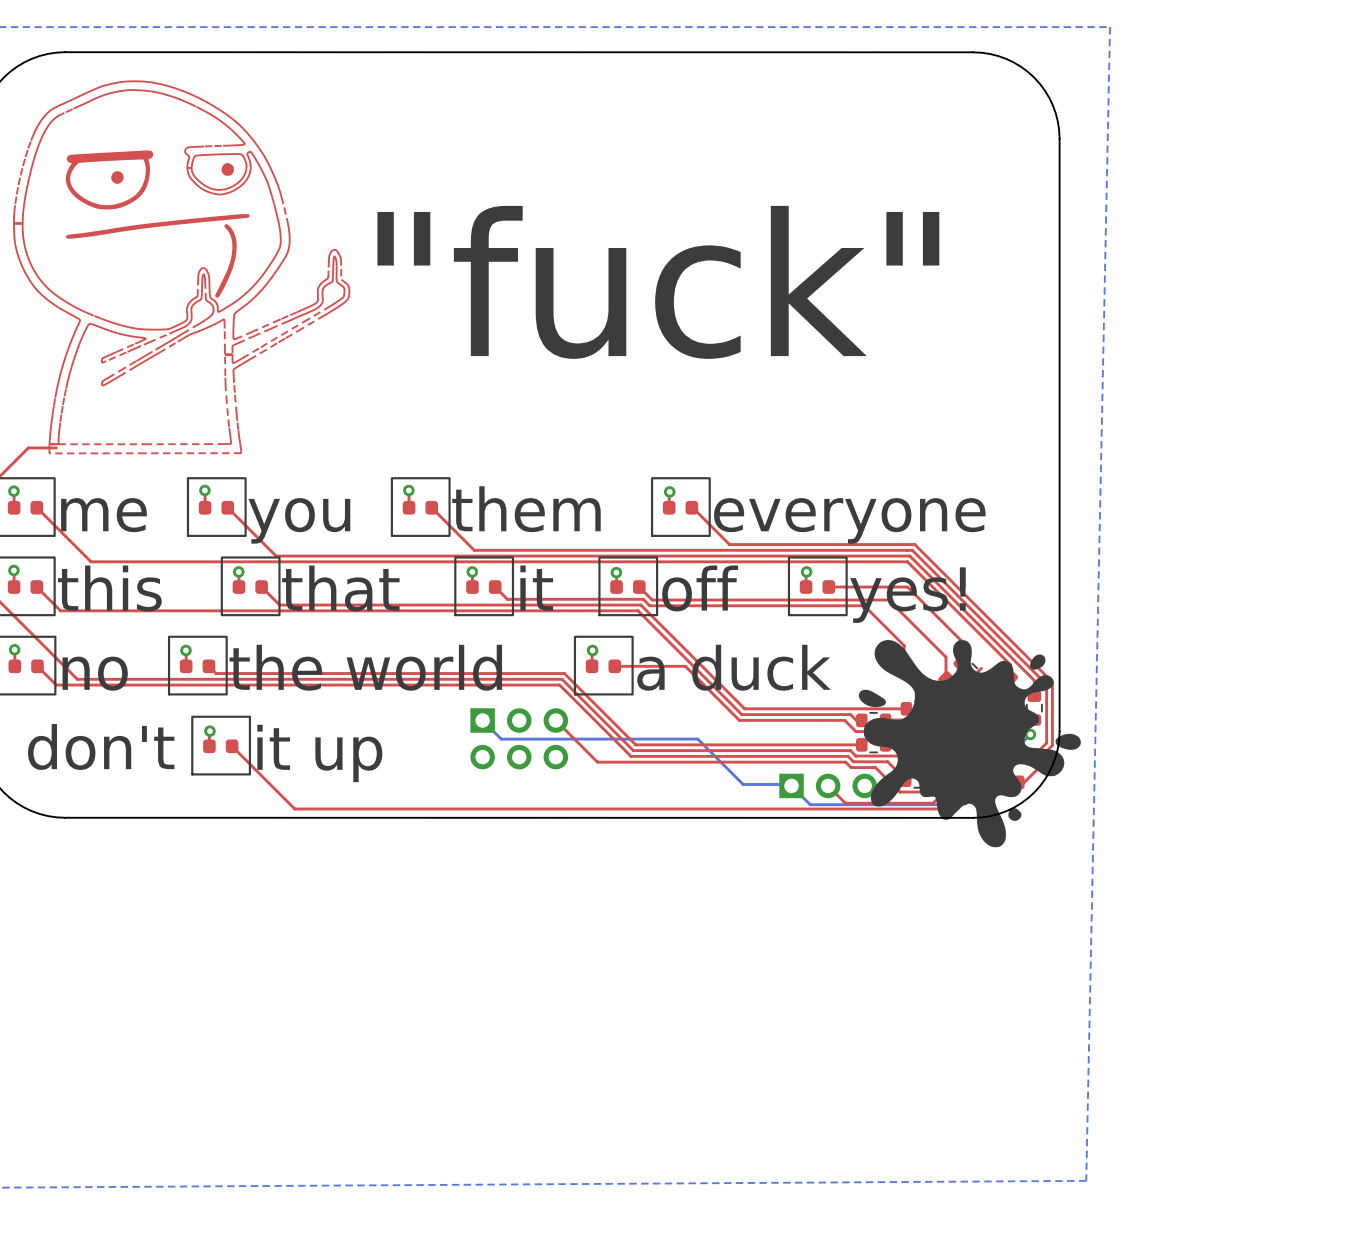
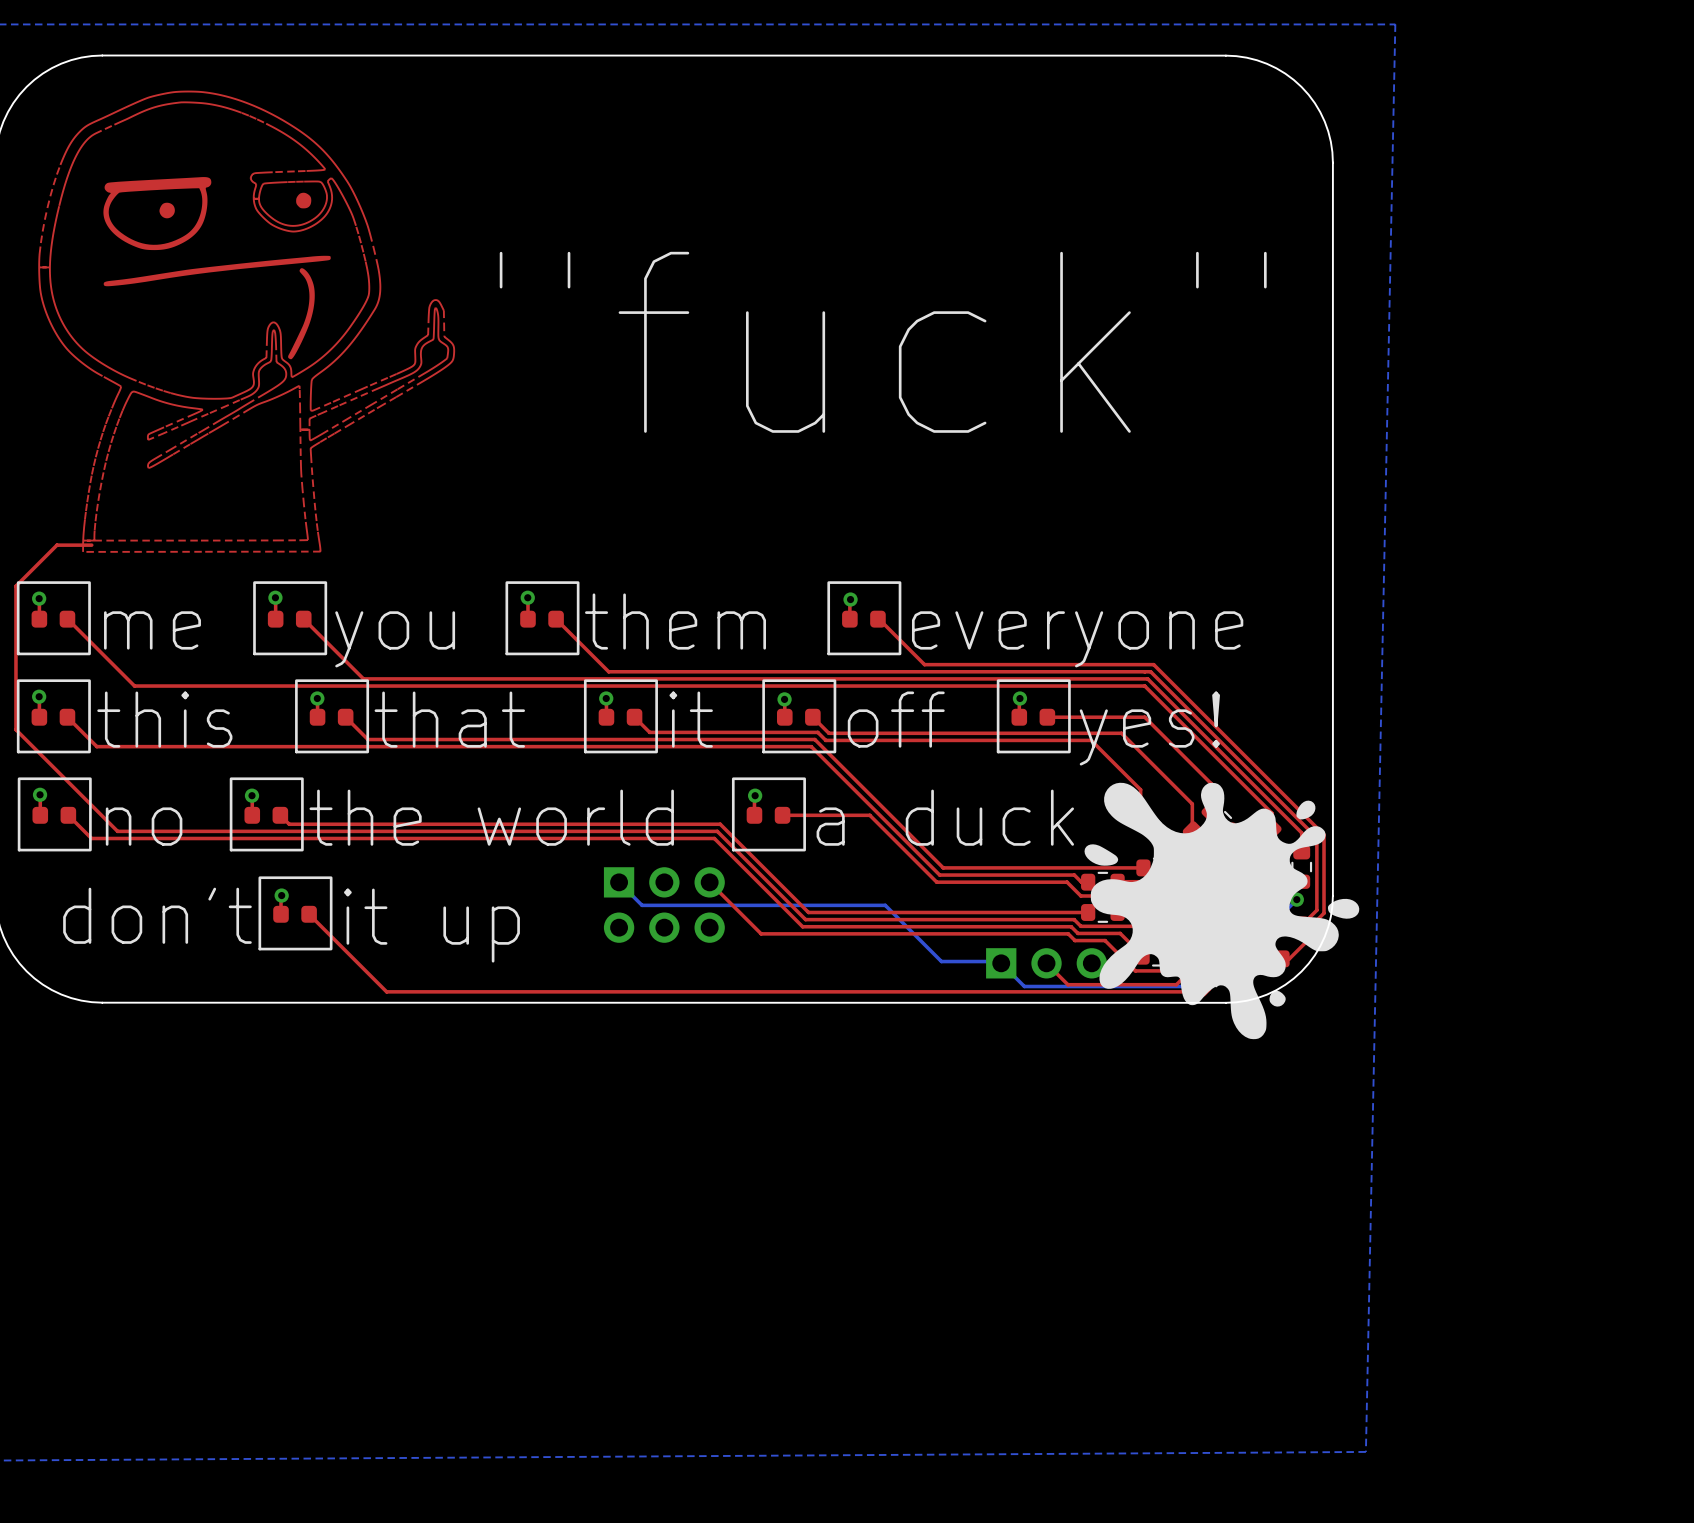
top track: (981, 668) (977, 671) (977, 679) -> none

